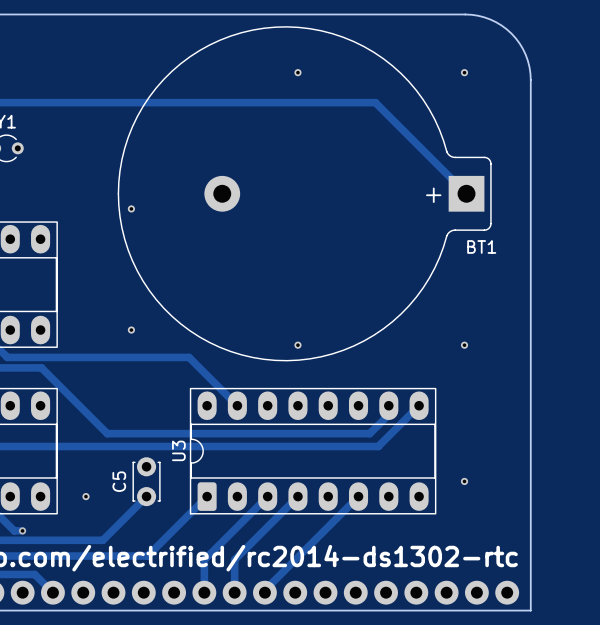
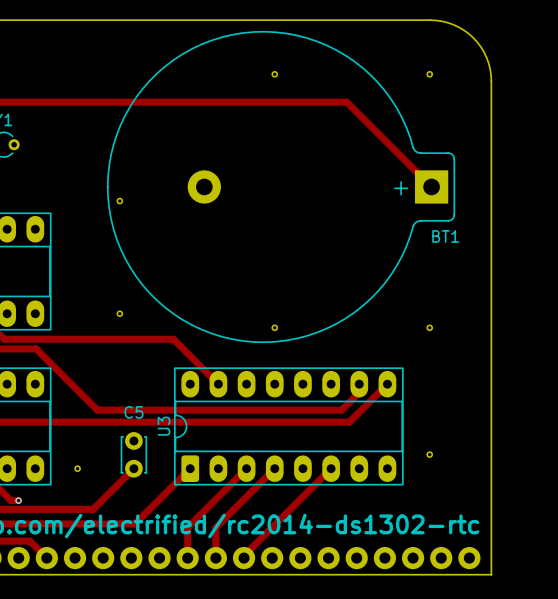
C5 name rotation: 0° (119, 481) -> 90° clockwise (133, 412)
C5 name position: C5 (119, 481) -> C5 (133, 412)

